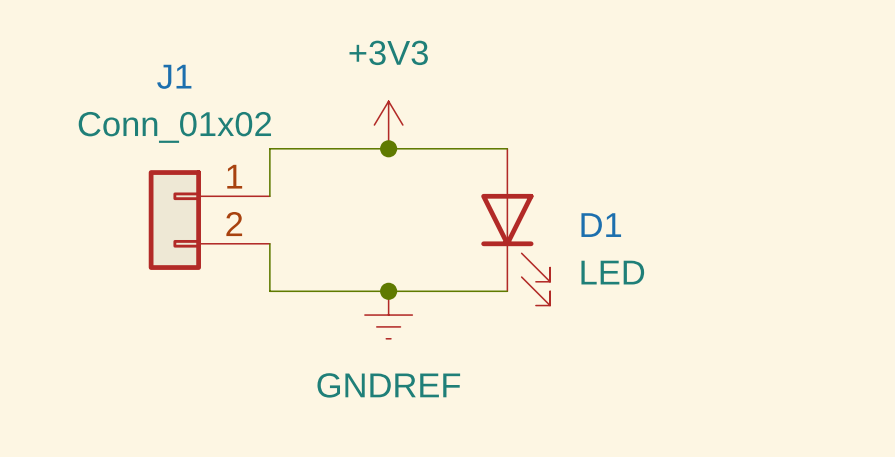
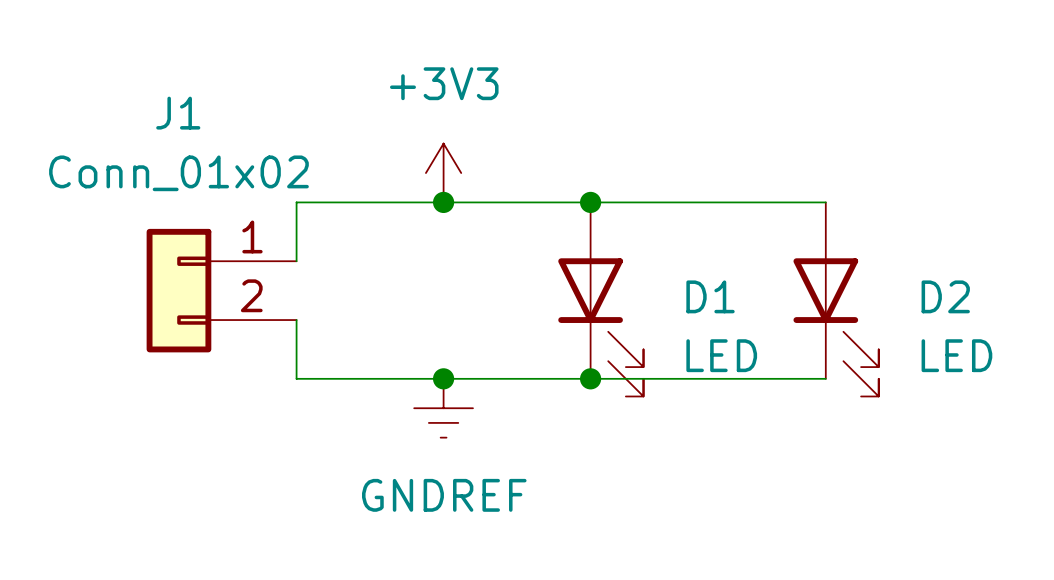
wire: none -> (590, 202) (825, 202)
junction: none -> (590, 202)
D2: none -> LED (836, 299)
wire: none -> (590, 378) (825, 378)
junction: none -> (590, 378)

